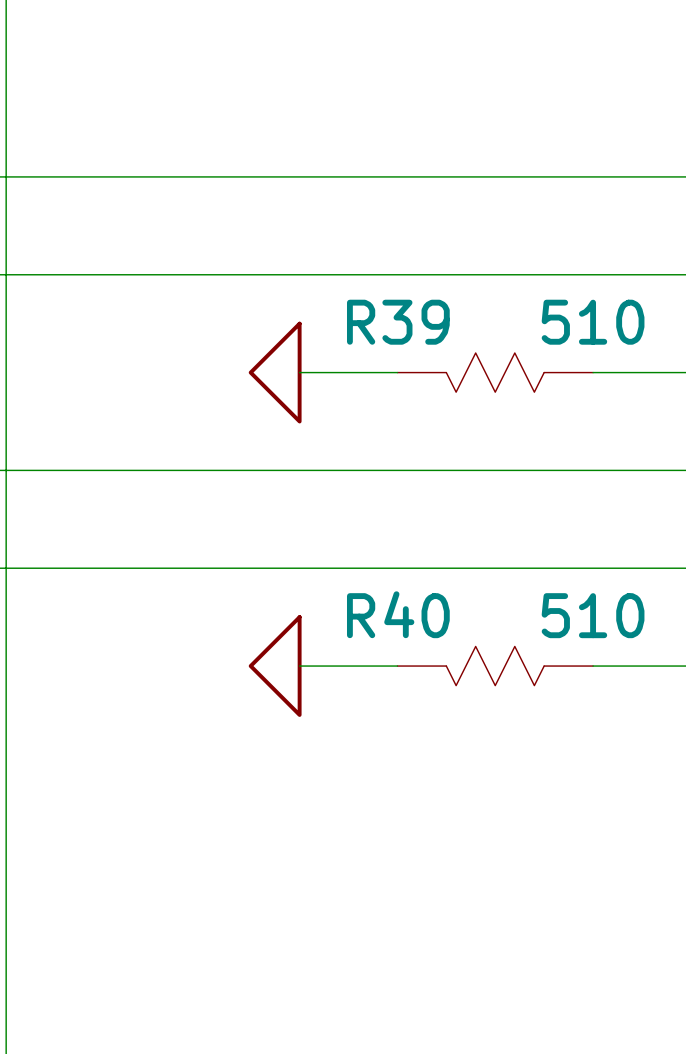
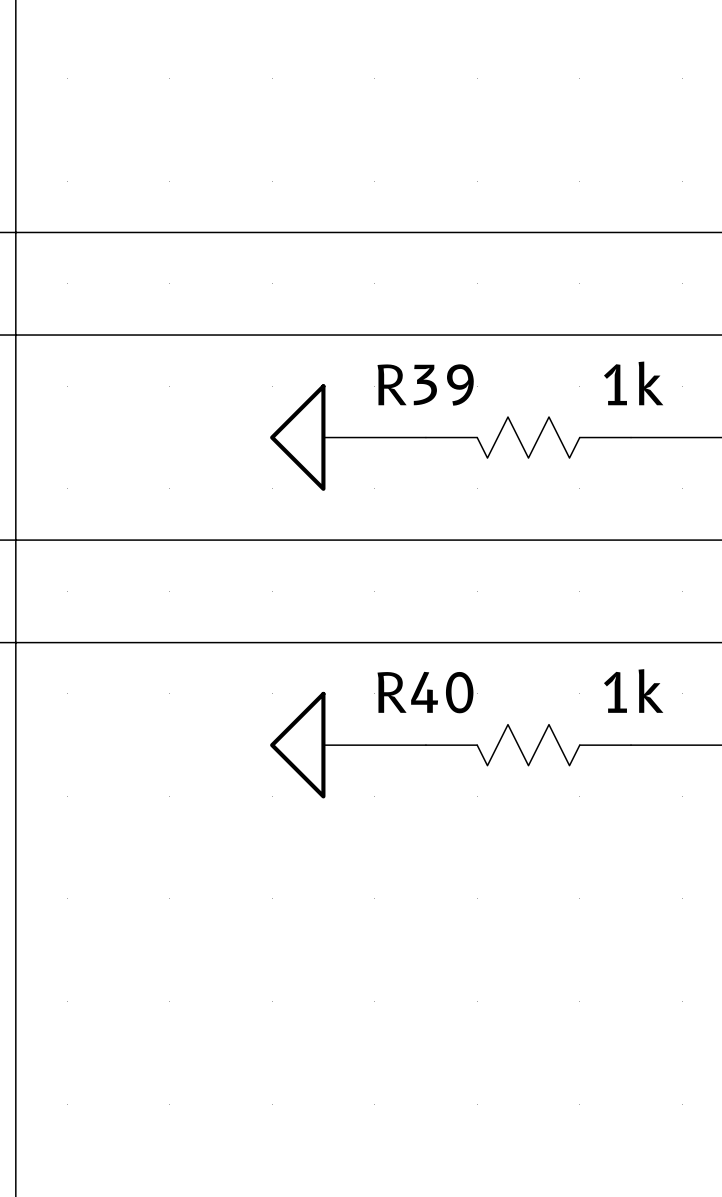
R39 value: 510 (593, 322) -> 1k (633, 383)
R40 value: 510 (593, 615) -> 1k (633, 691)

